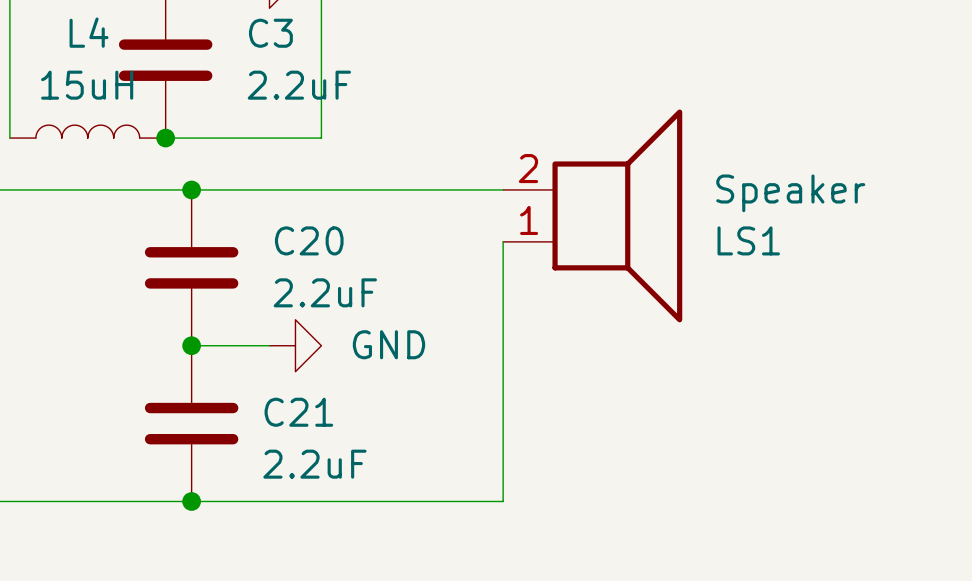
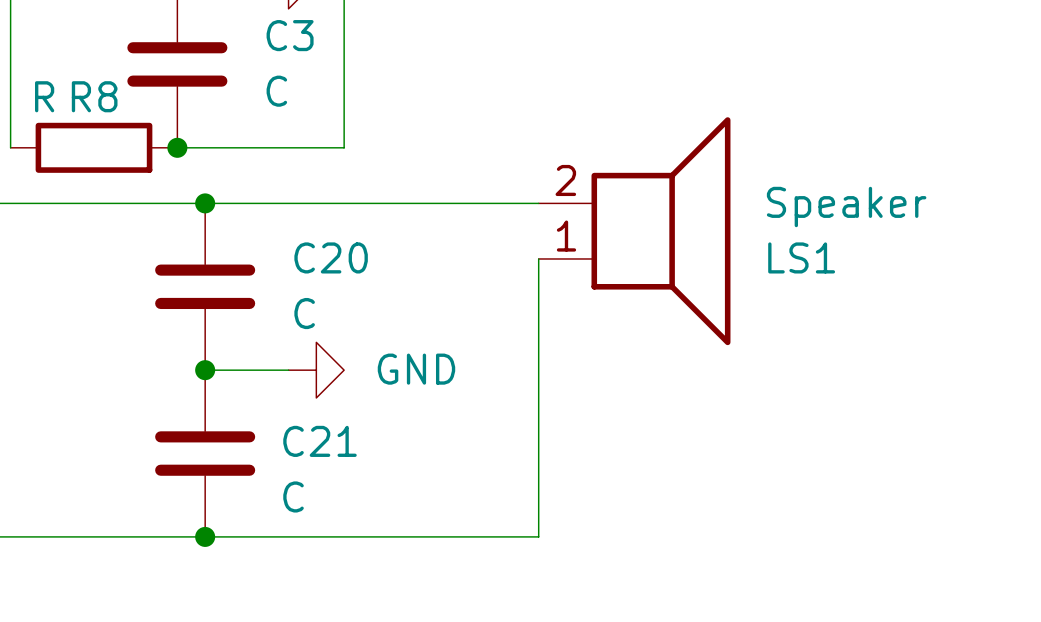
C3 value: 2.2uF (299, 85) -> C (276, 91)
L4: 15uH (87, 131) -> none
R8: none -> R (93, 147)
C20 value: 2.2uF (325, 292) -> C (304, 313)
C21 value: 2.2uF (314, 464) -> C (293, 496)

